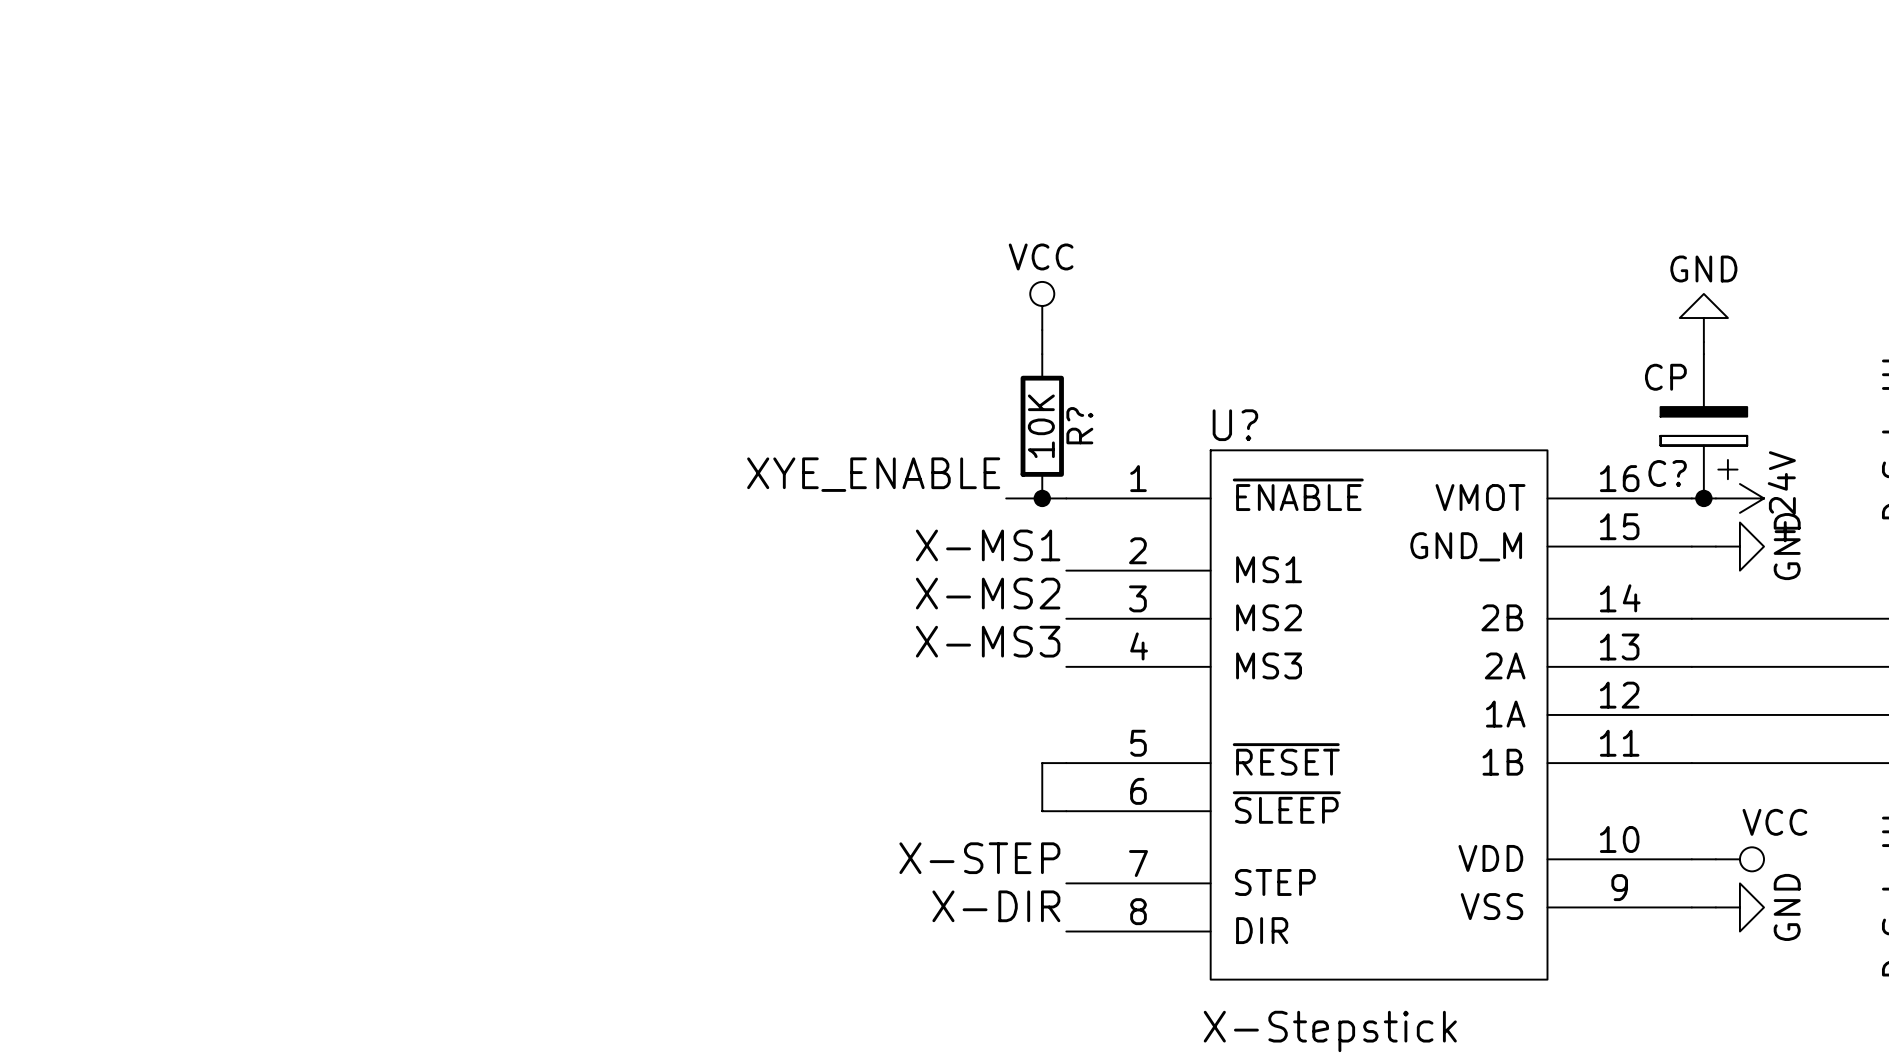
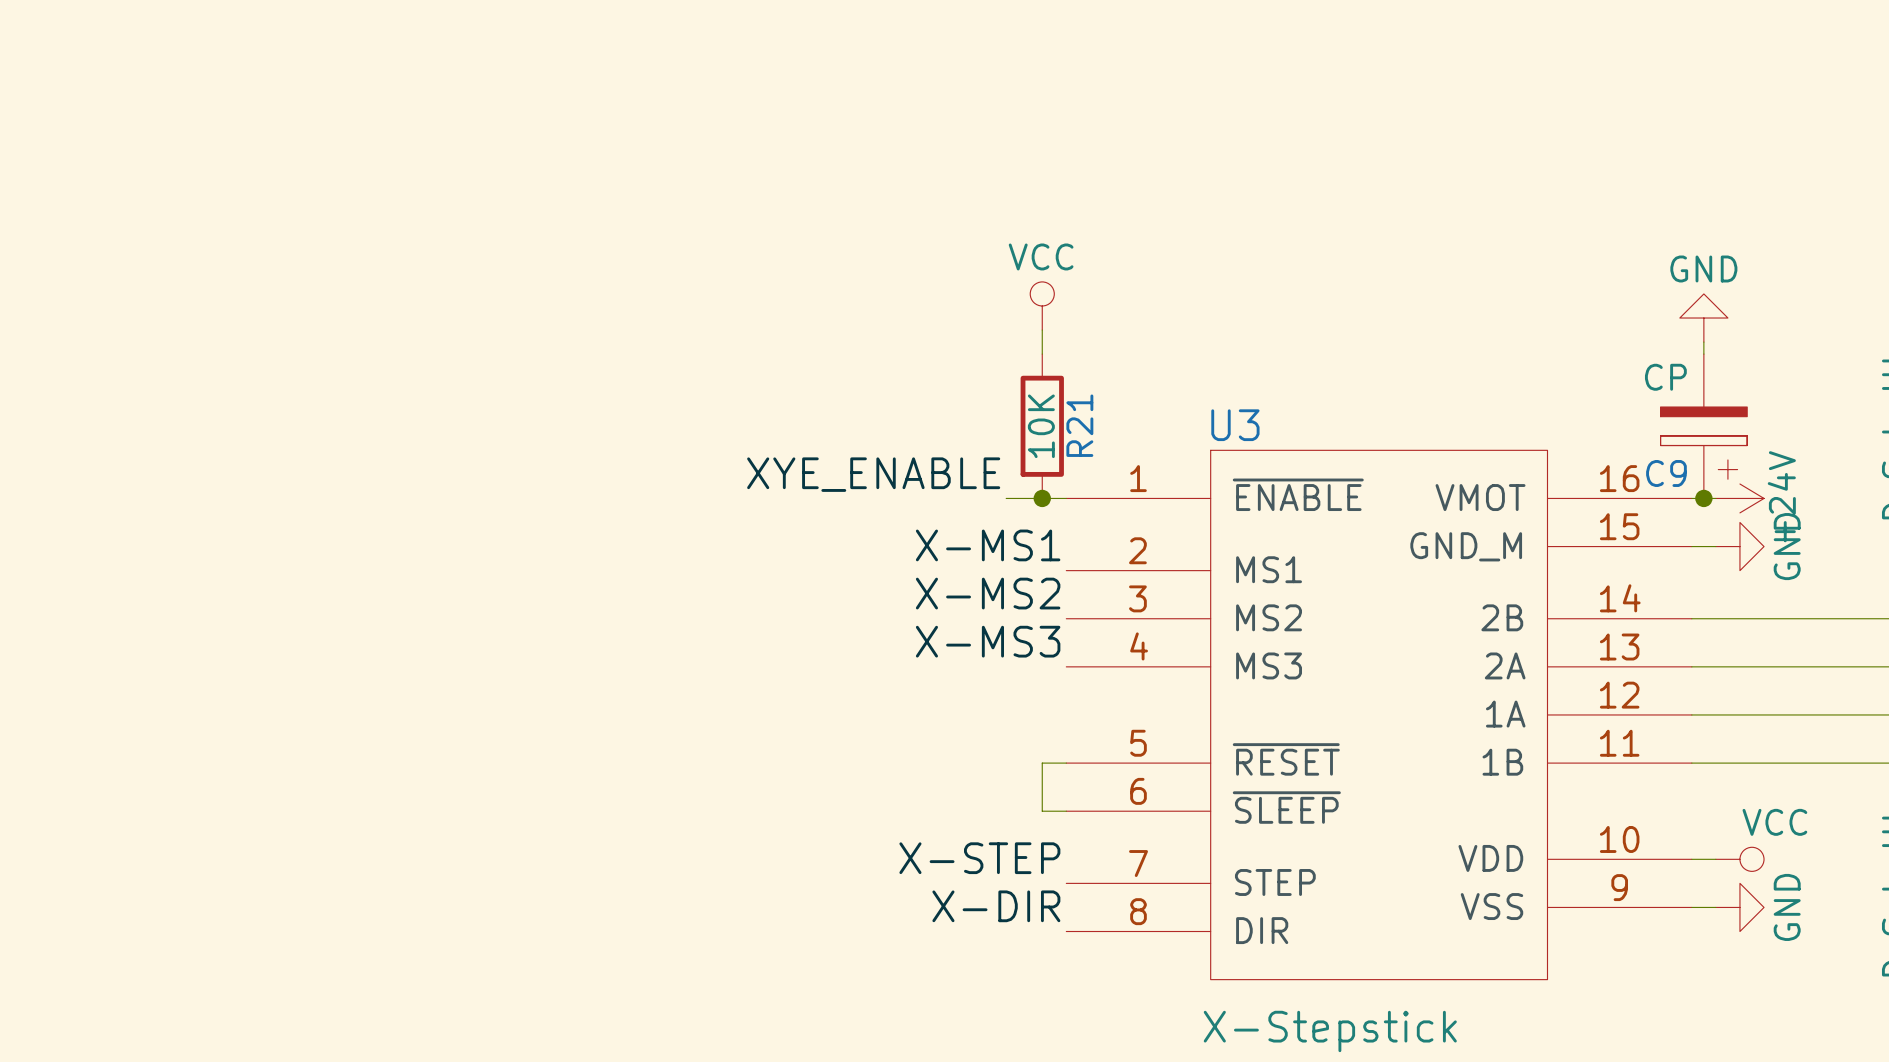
R? name: R? (1079, 425) -> R21 (1079, 425)
U? name: U? (1235, 425) -> U3 (1235, 425)
C? name: C? (1667, 473) -> C9 (1666, 473)

